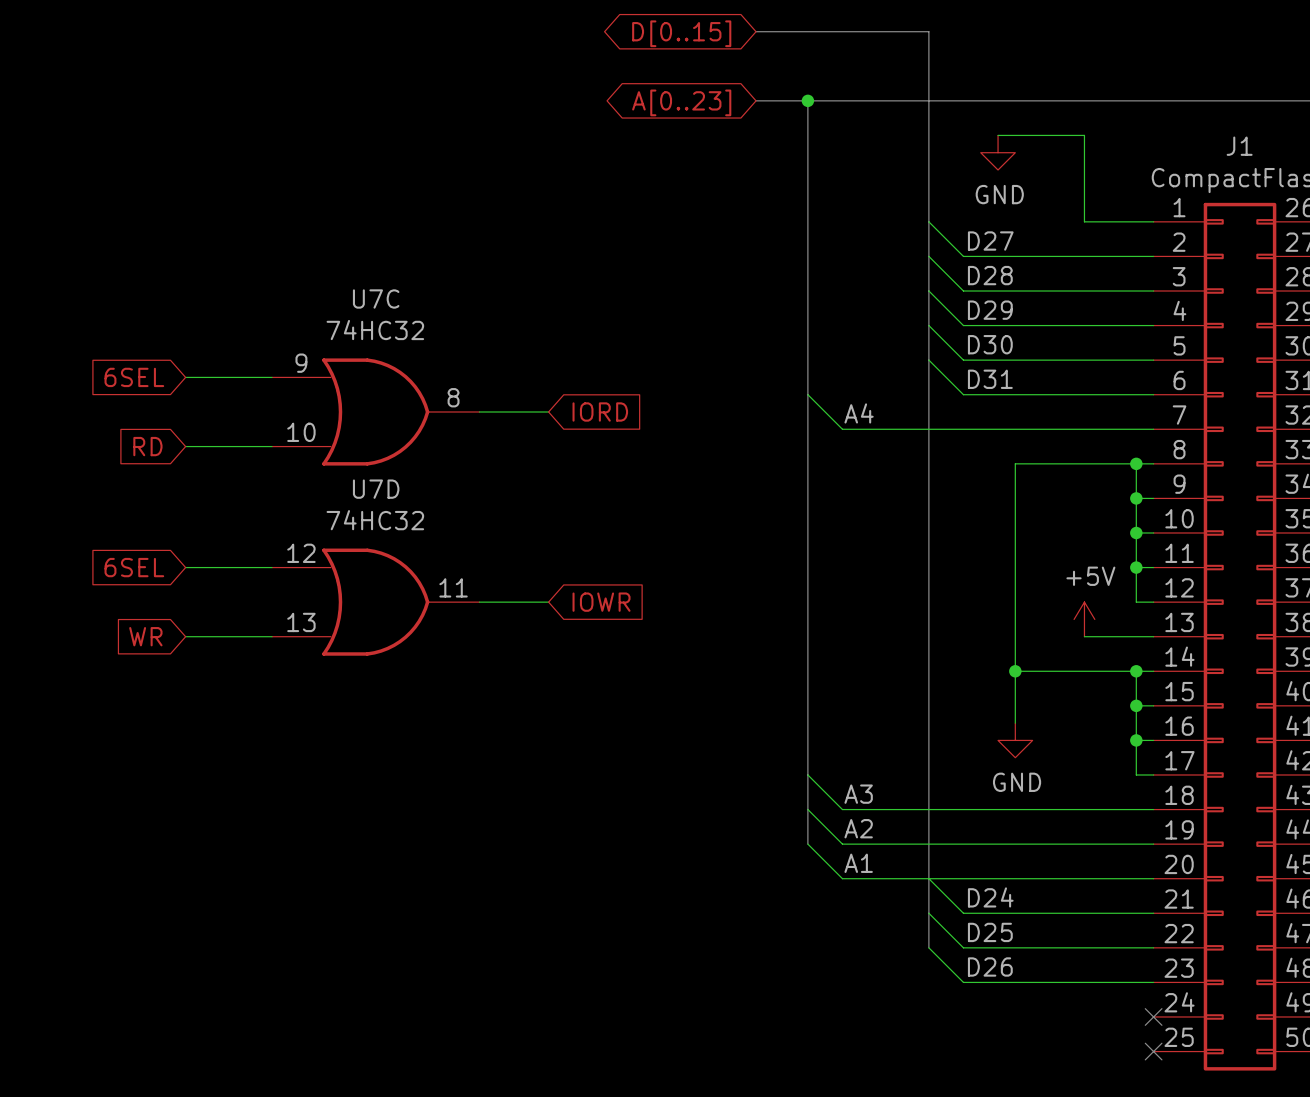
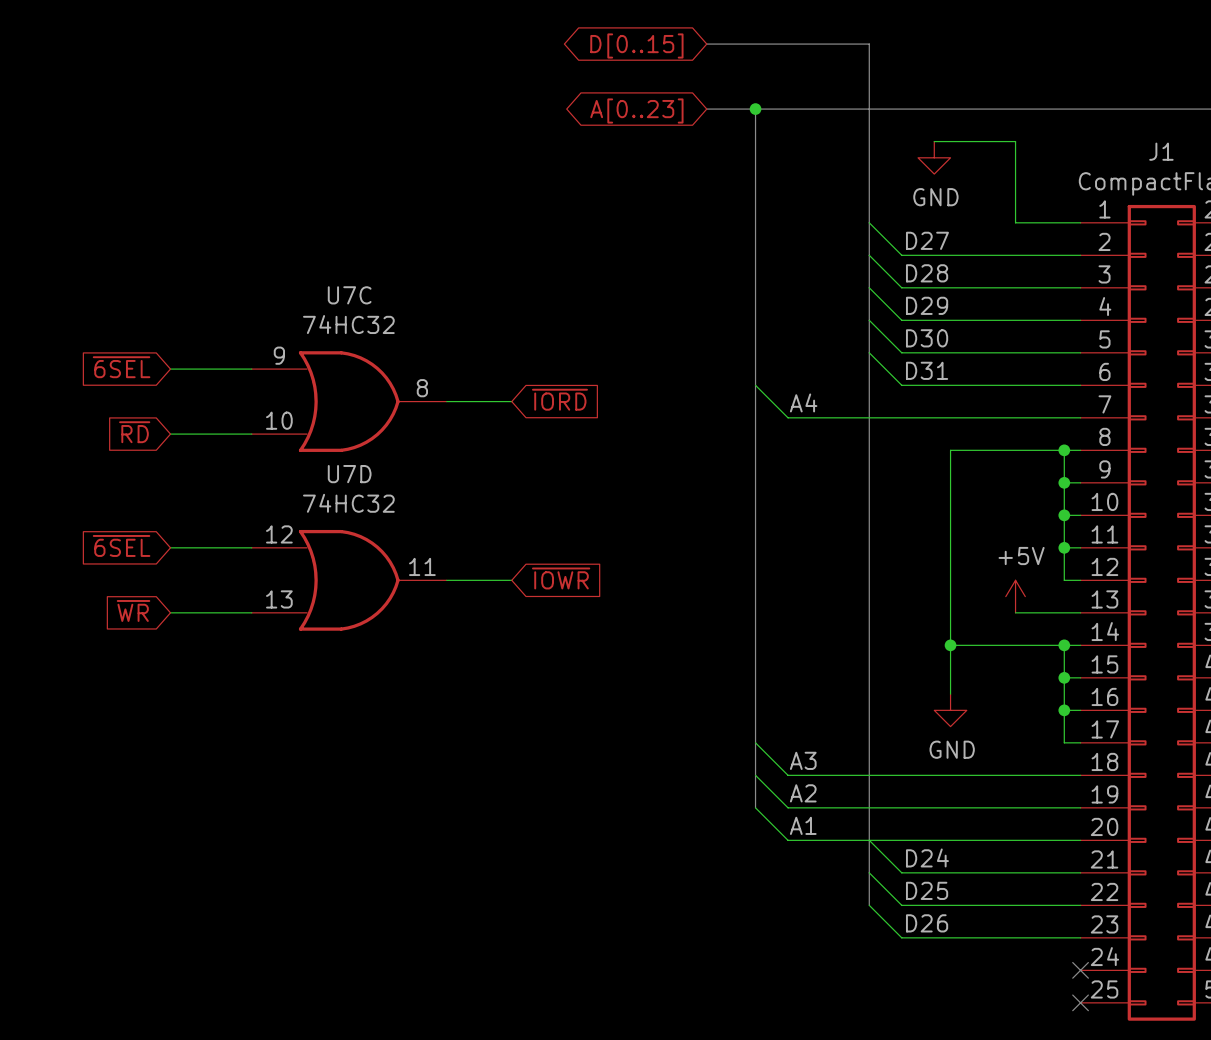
global label: 6SEL (134, 377) -> ~{6SEL} (121, 367)
global label: IORD (600, 411) -> ~{IORD} (559, 399)
global label: RD (147, 446) -> ~{RD} (134, 432)
global label: 6SEL (134, 567) -> ~{6SEL} (121, 545)
global label: IOWR (601, 602) -> ~{IOWR} (561, 578)
global label: WR (145, 636) -> ~{WR} (133, 610)

